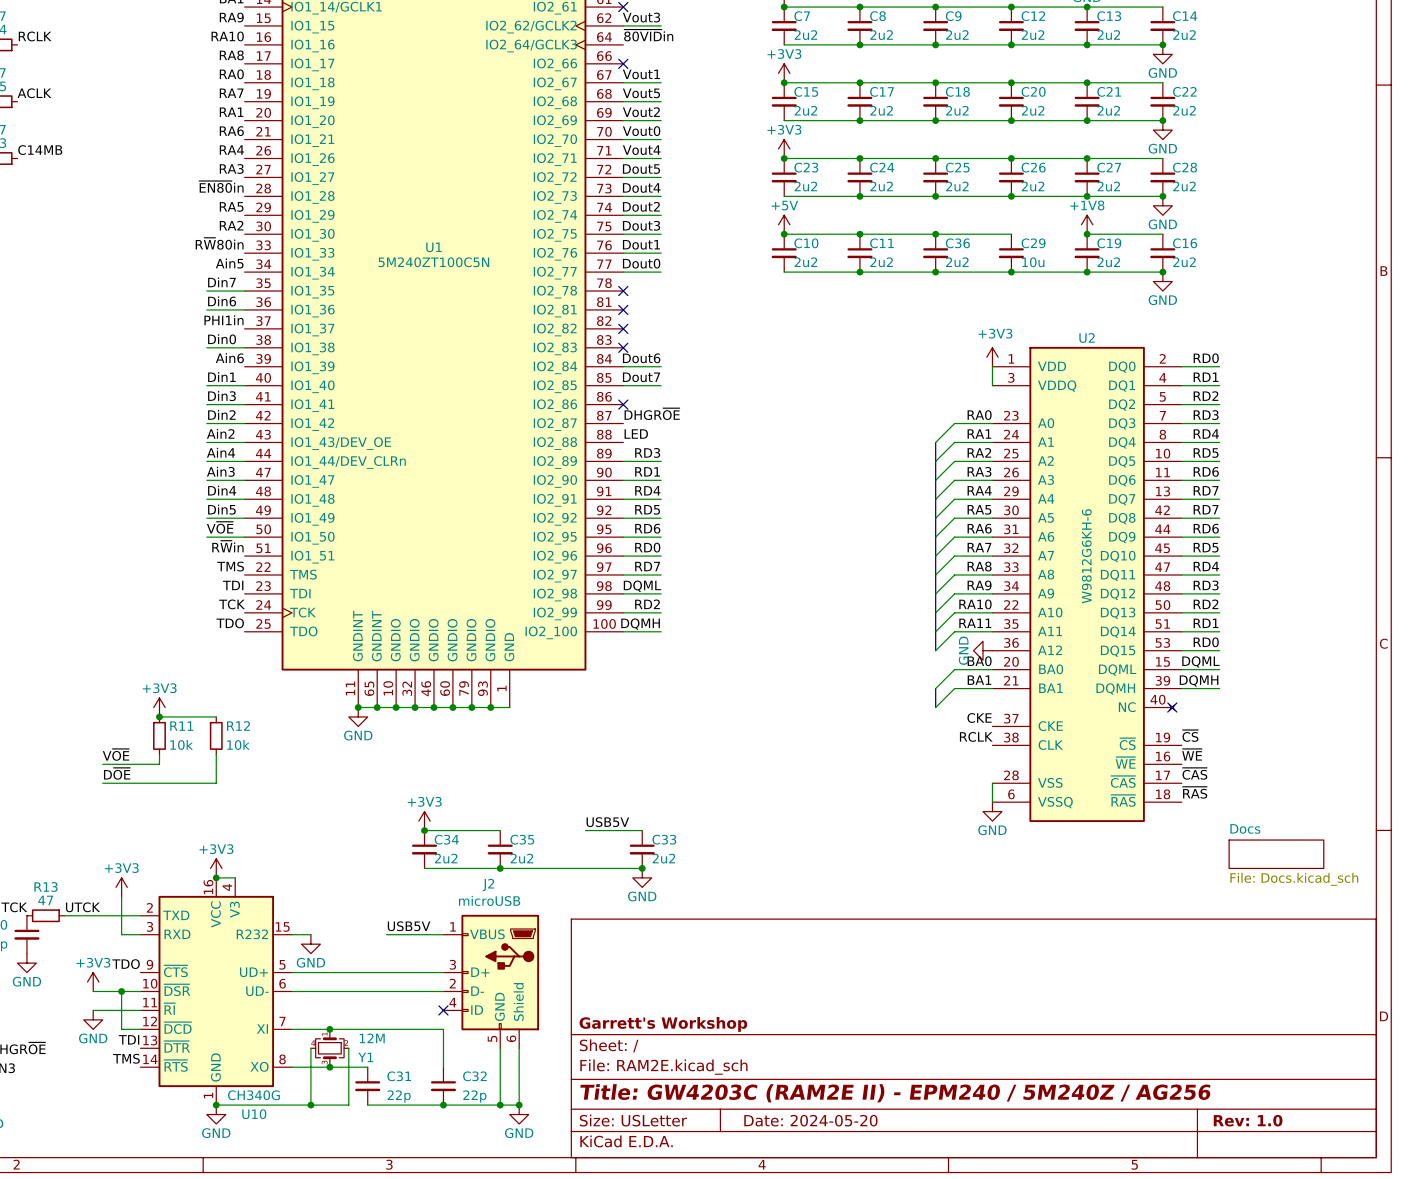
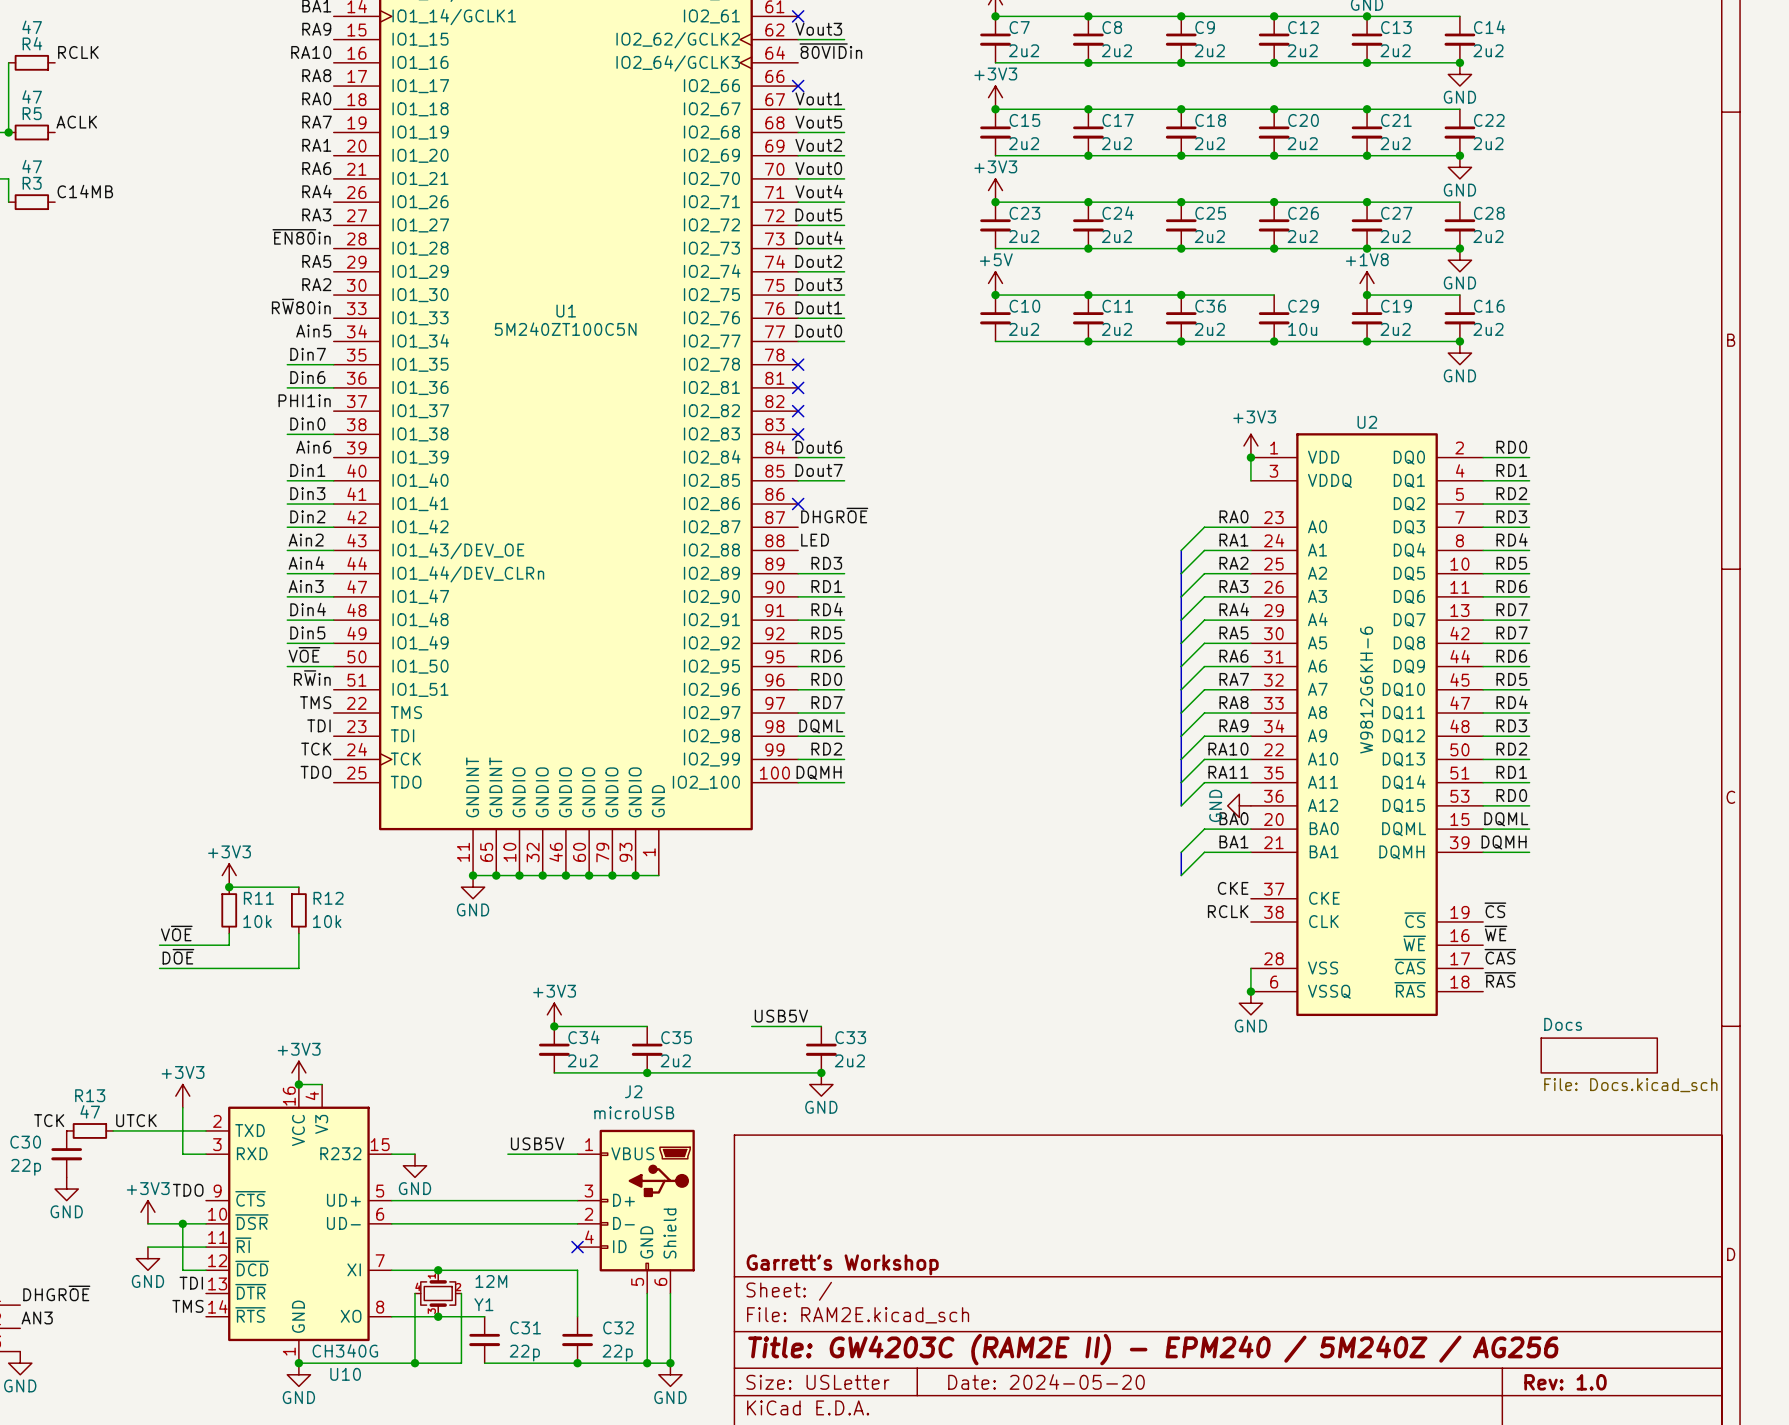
U2 symbol: [992, 346, 1182, 823] -> [1250, 433, 1484, 1017]
junction: none -> (1250, 457)
no-connect mark: (1172, 707) -> none
junction: none -> (1250, 991)

